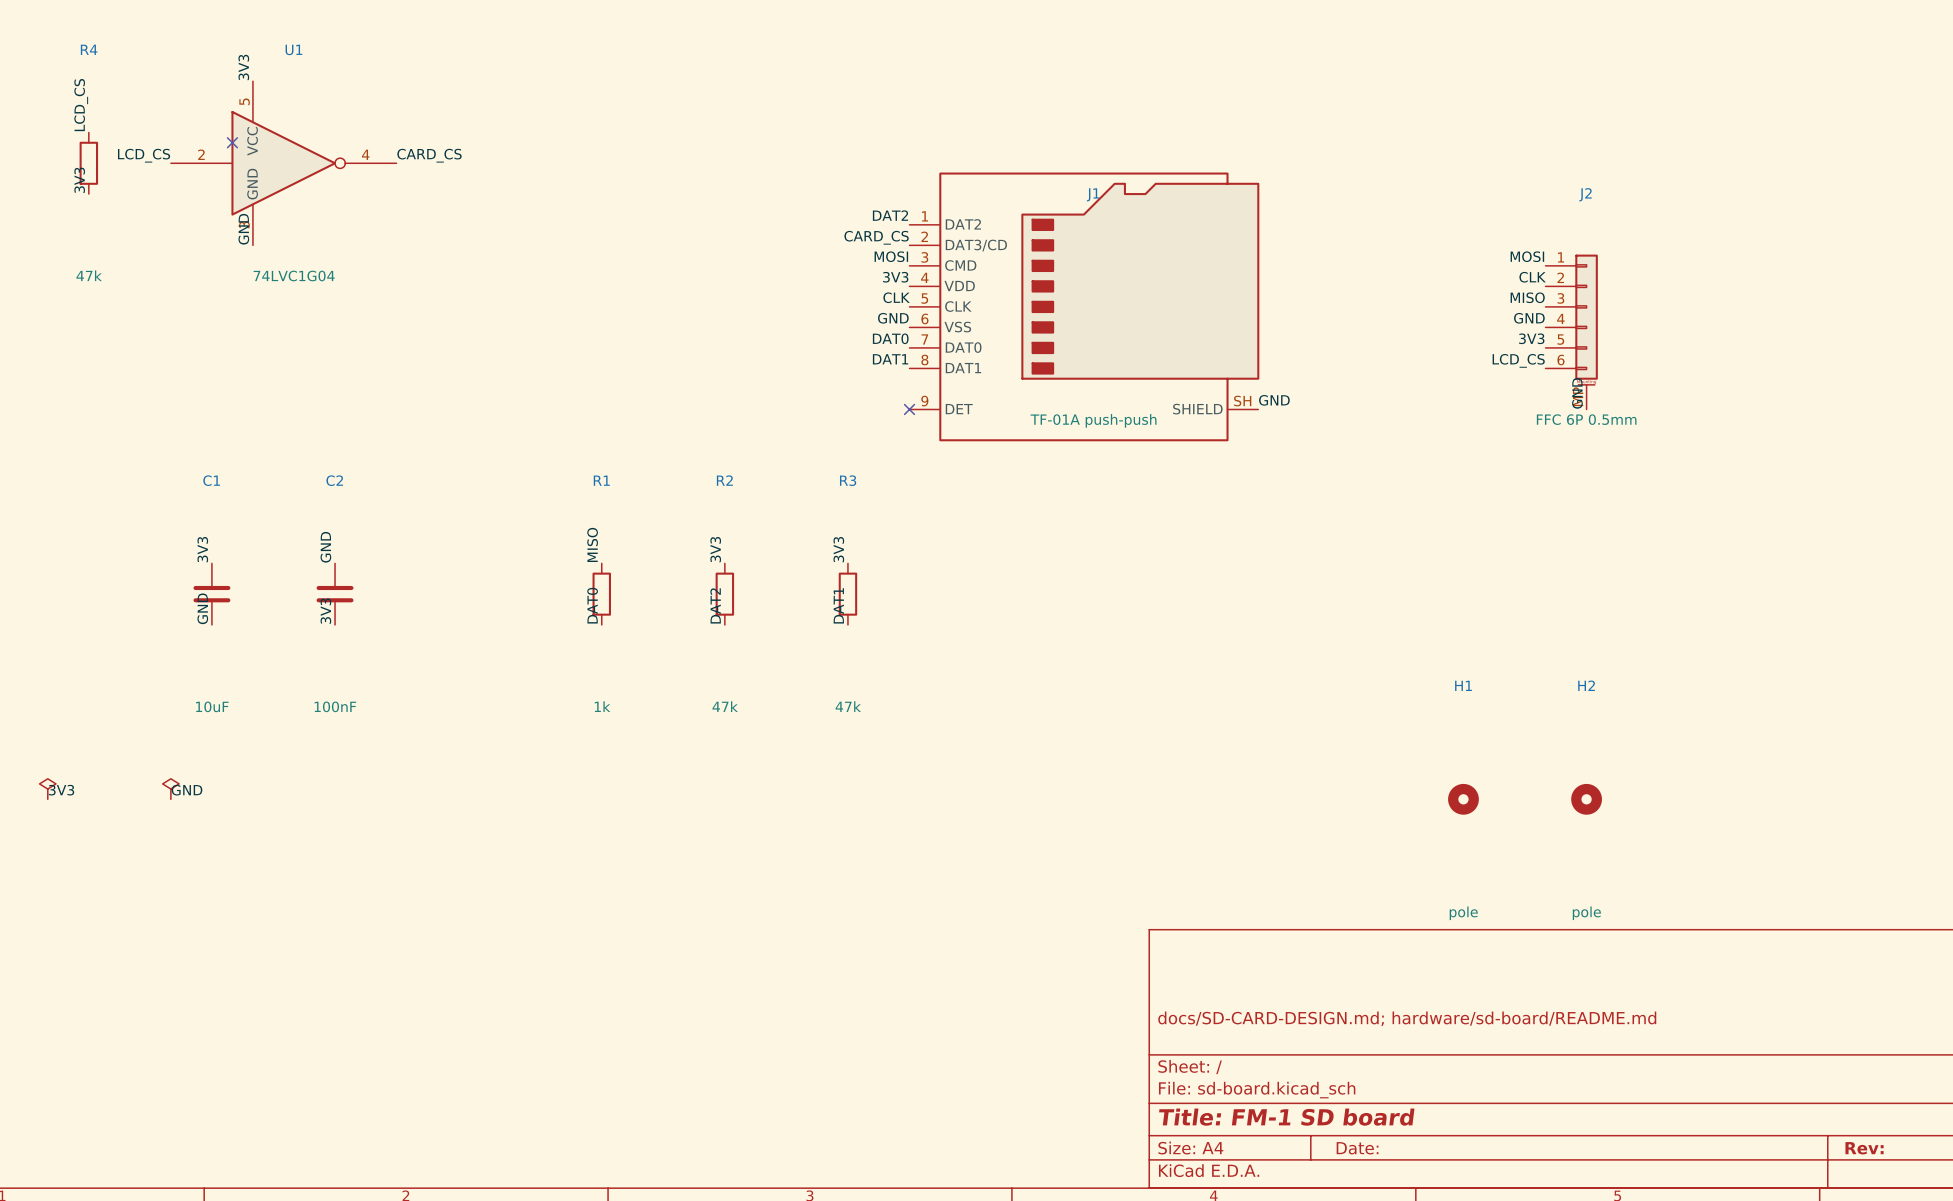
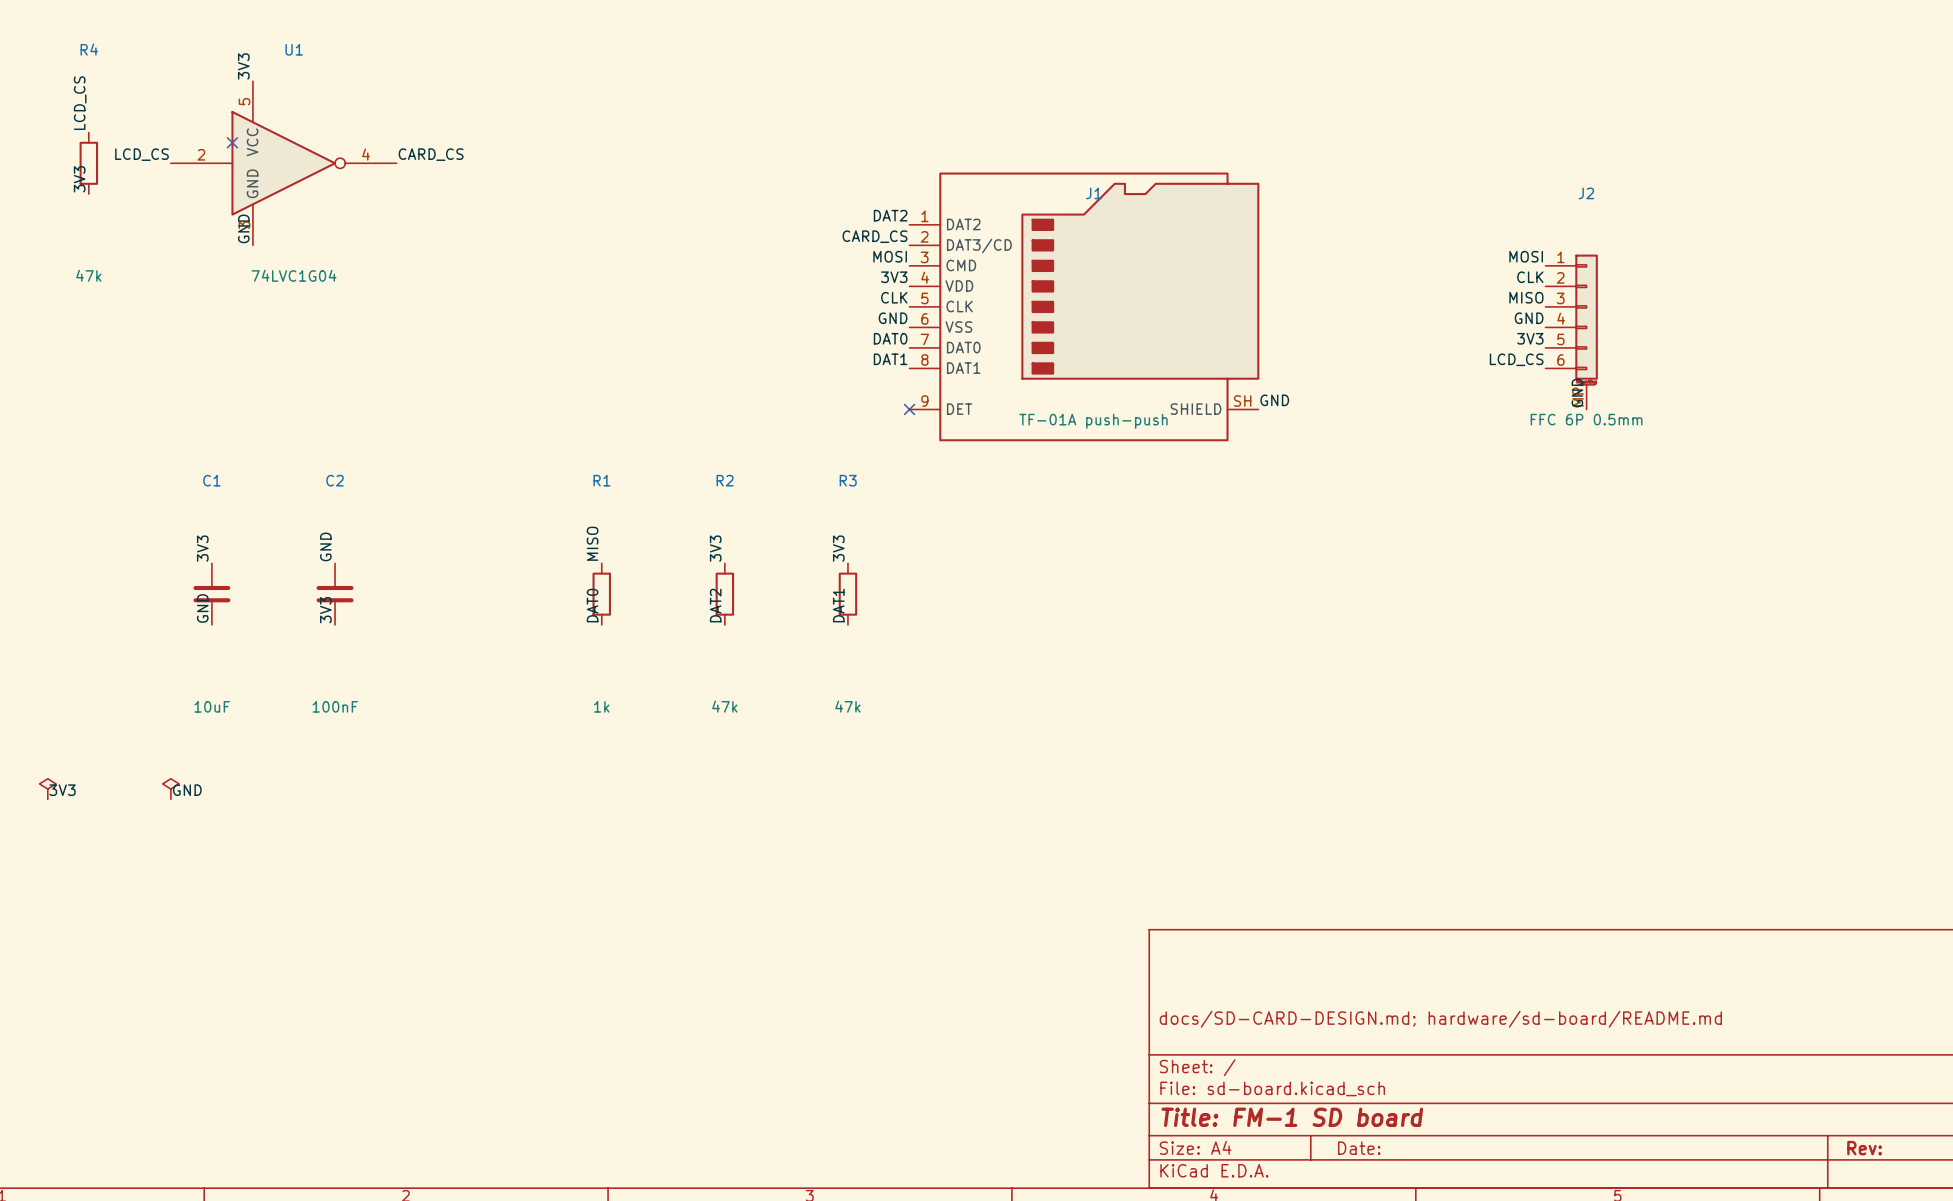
H1: pole (1463, 799) -> none
H2: pole (1586, 799) -> none

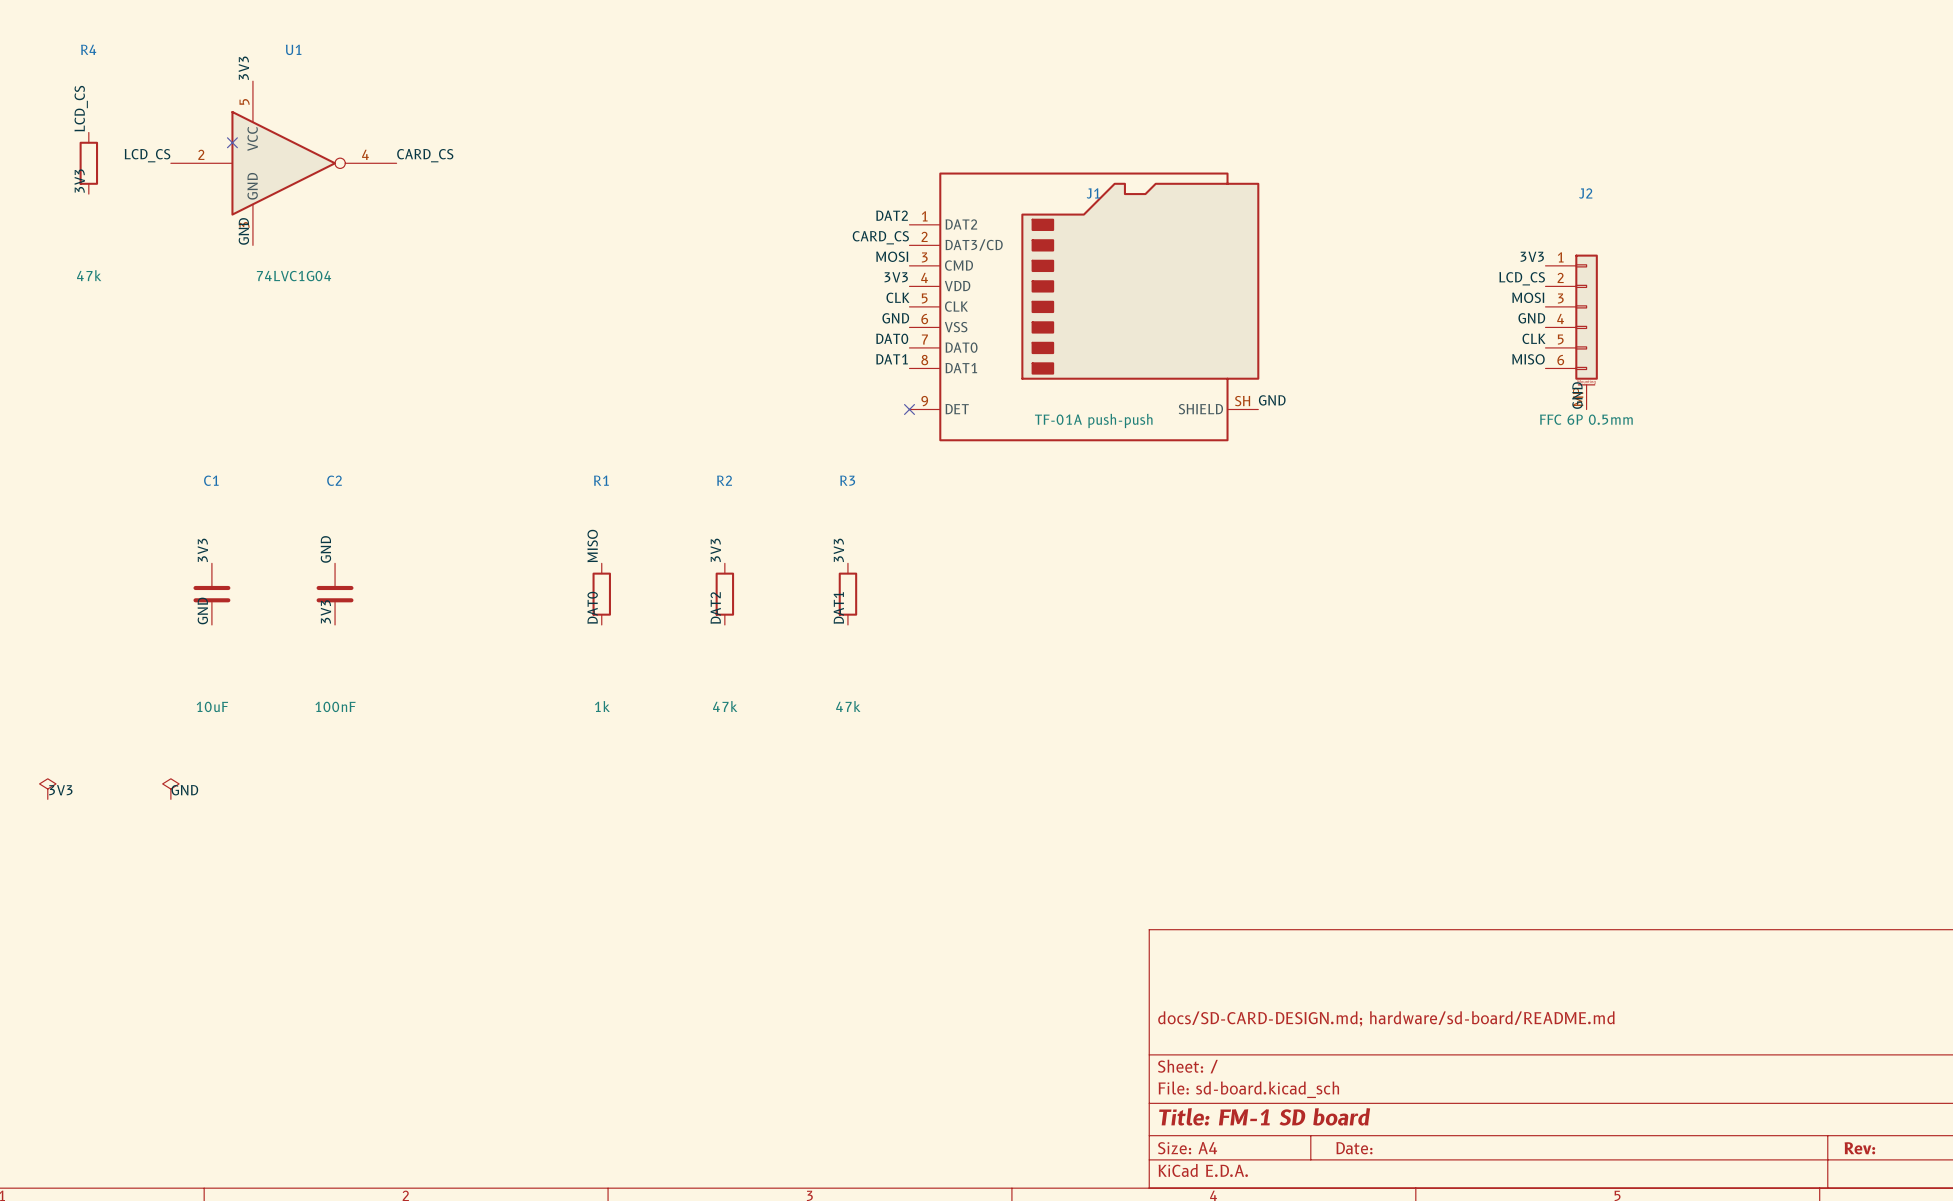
label: MOSI (1526, 256) -> 3V3 (1532, 256)
label: CLK (1530, 277) -> LCD_CS (1522, 278)
label: MISO (1526, 297) -> MOSI (1528, 297)
label: 3V3 (1530, 338) -> CLK (1533, 338)
label: LCD_CS (1516, 359) -> MISO (1528, 359)

